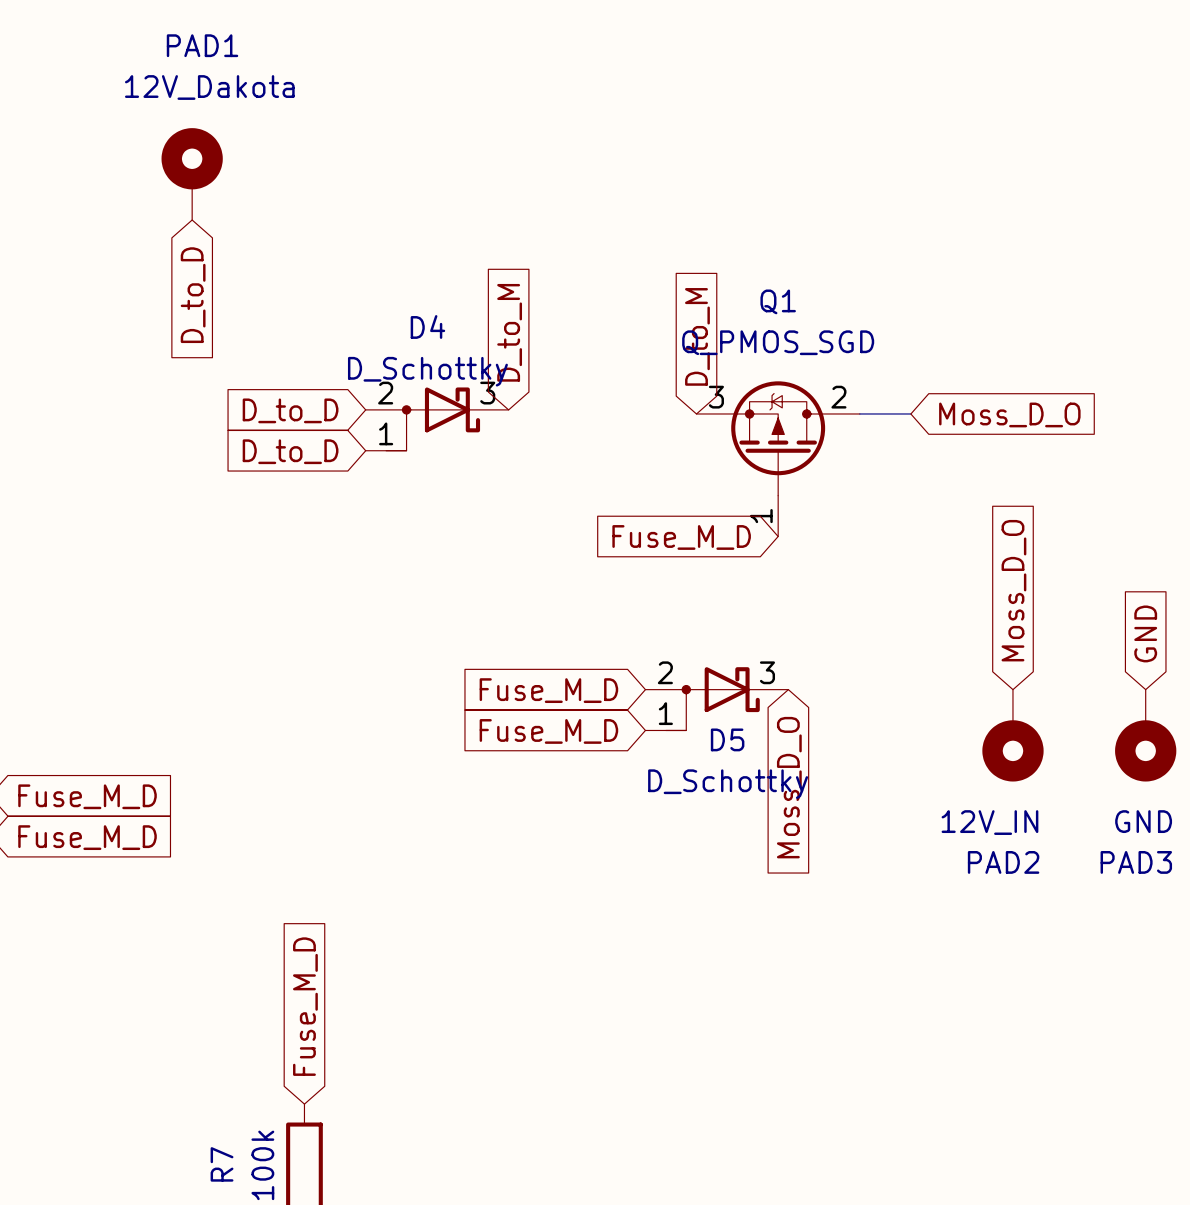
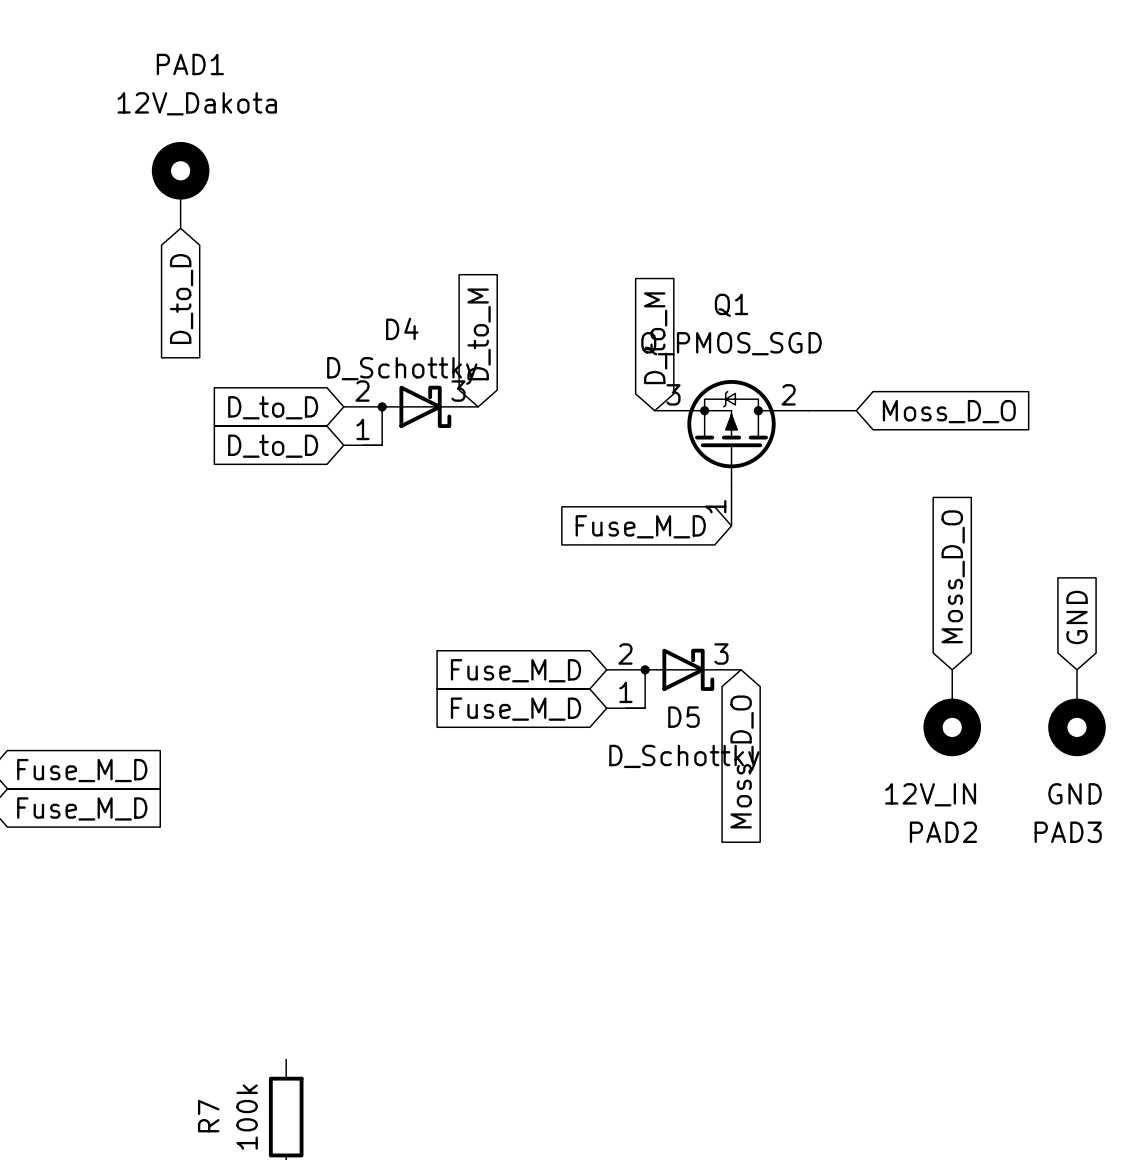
global label: Fuse_M_D (305, 1006) -> none

